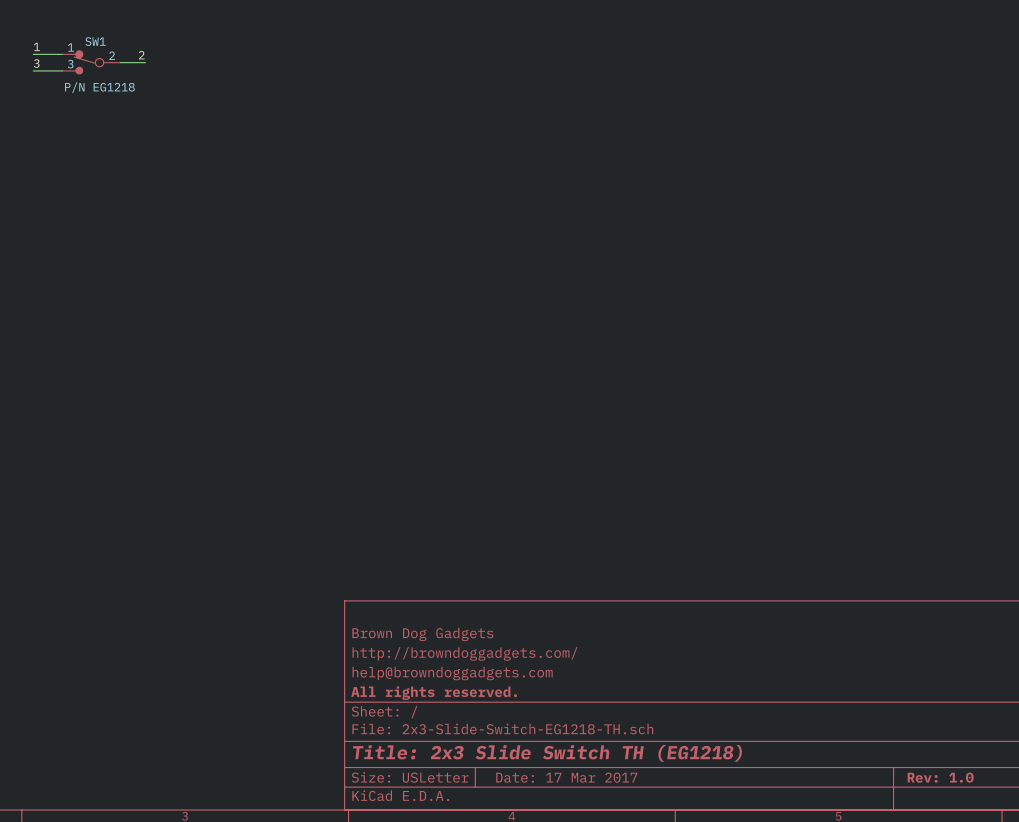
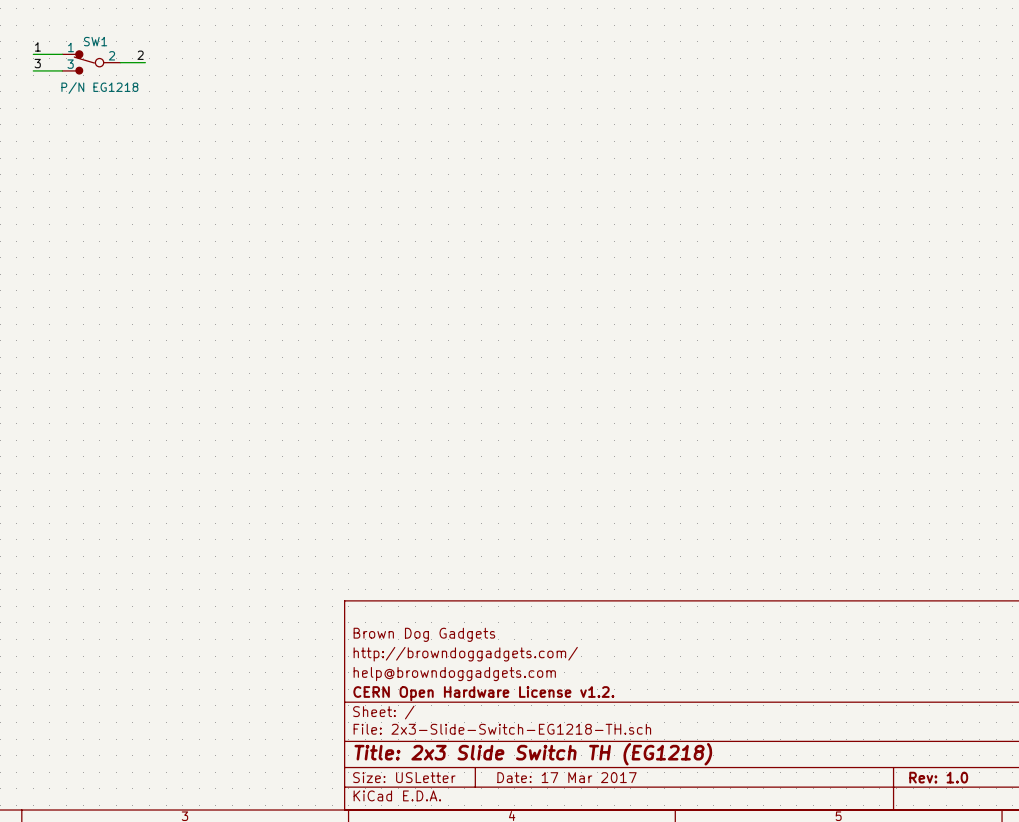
title block: All rights reserved. (434, 693) -> CERN Open Hardware License v1.2. (483, 693)

